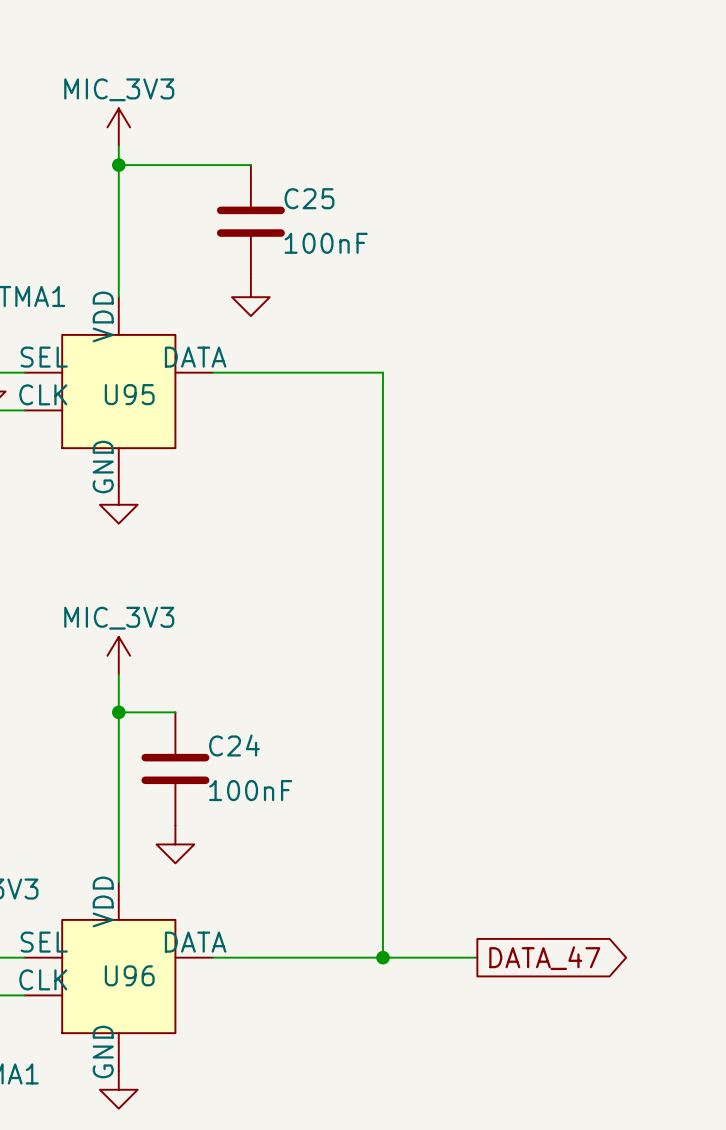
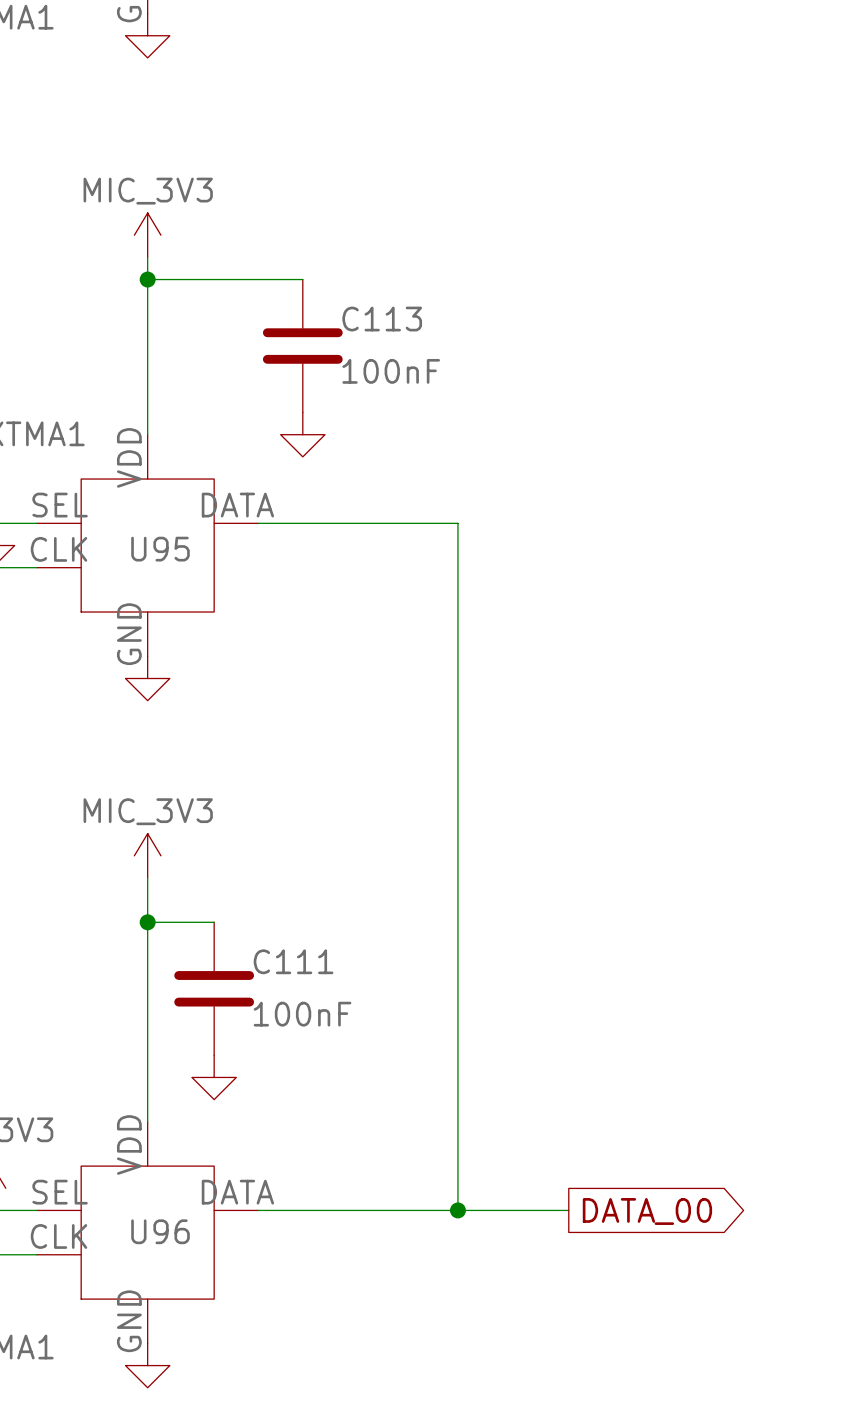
C25 name: C25 (309, 198) -> C113 (382, 319)
C24 name: C24 (234, 745) -> C111 (293, 961)
global label: DATA_47 (544, 958) -> DATA_00 (647, 1211)

